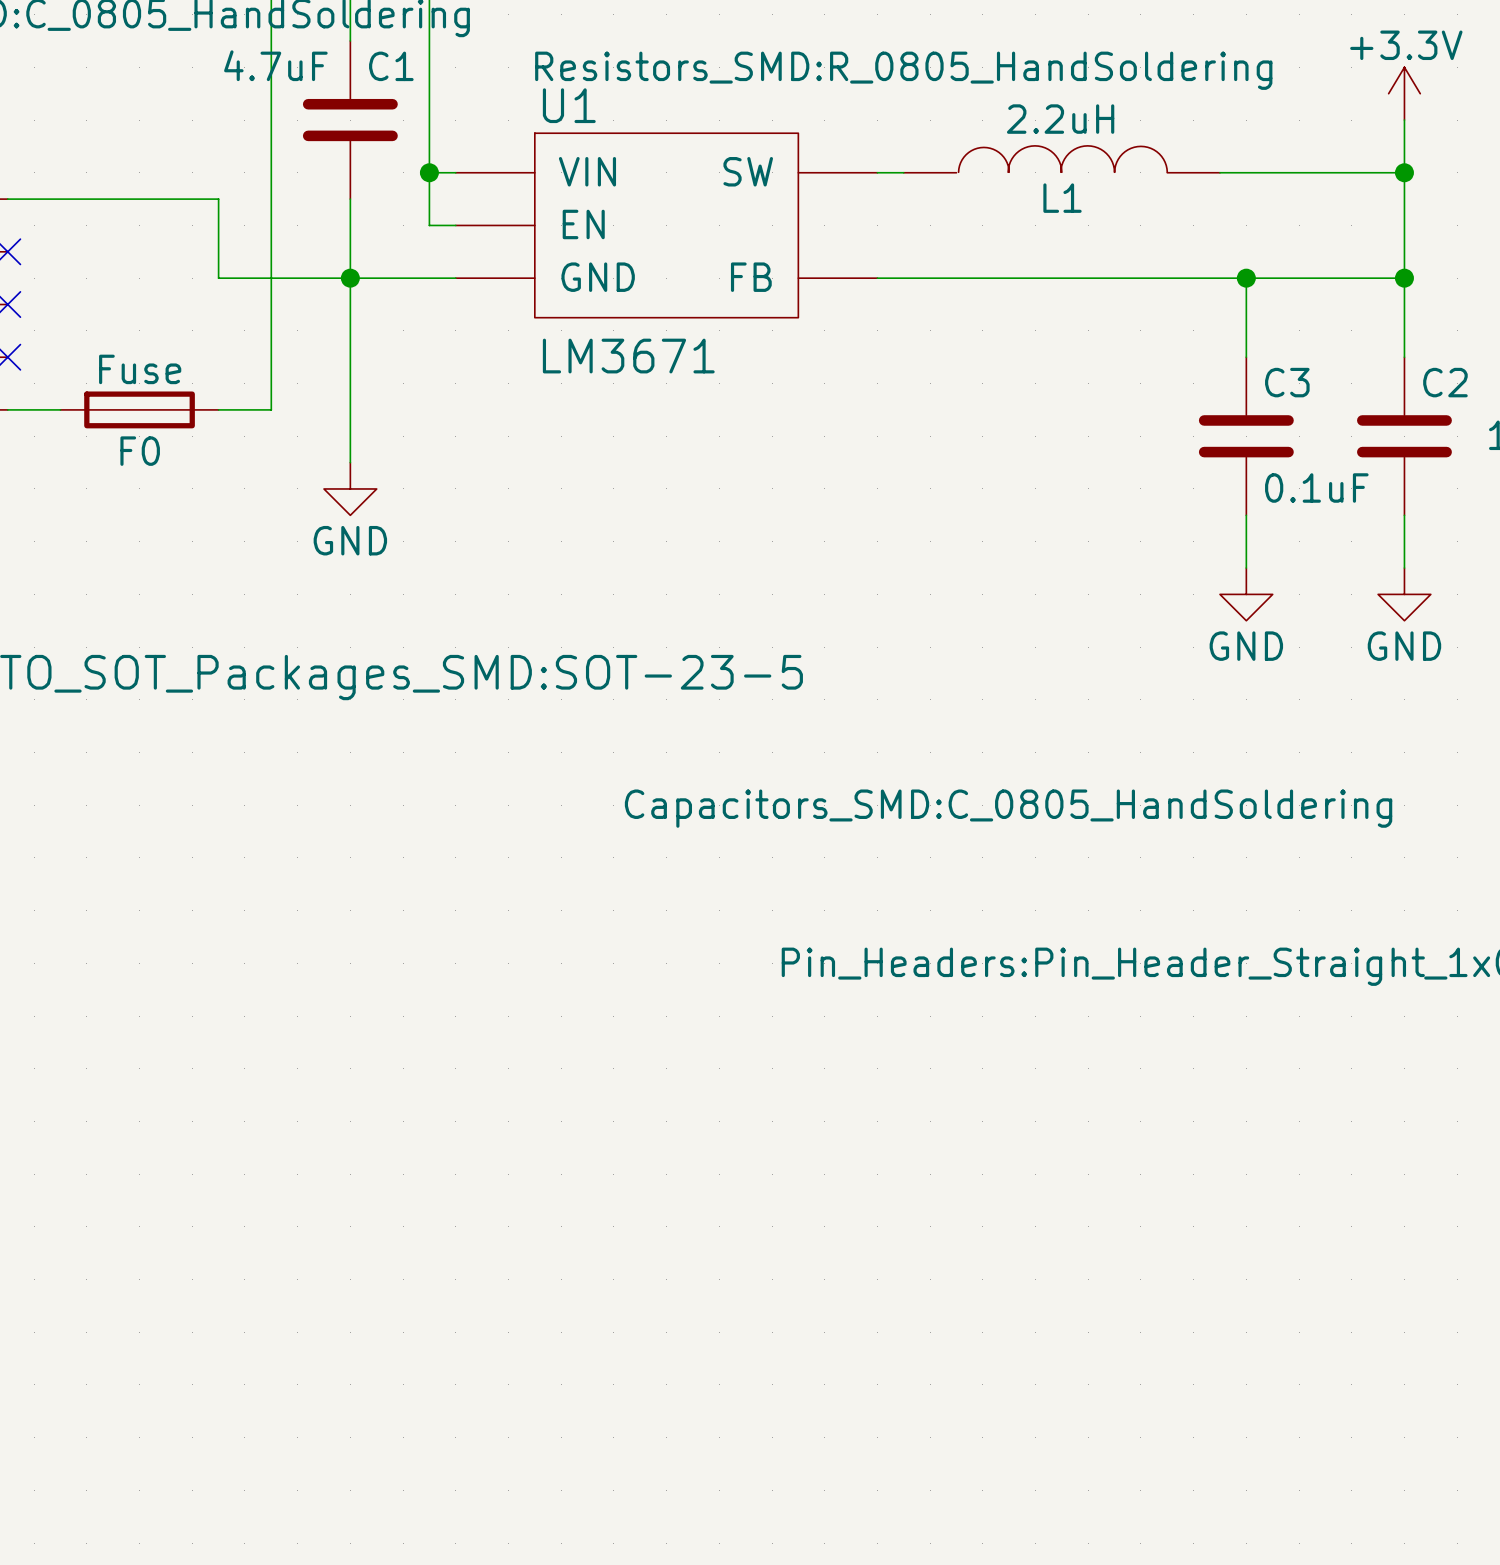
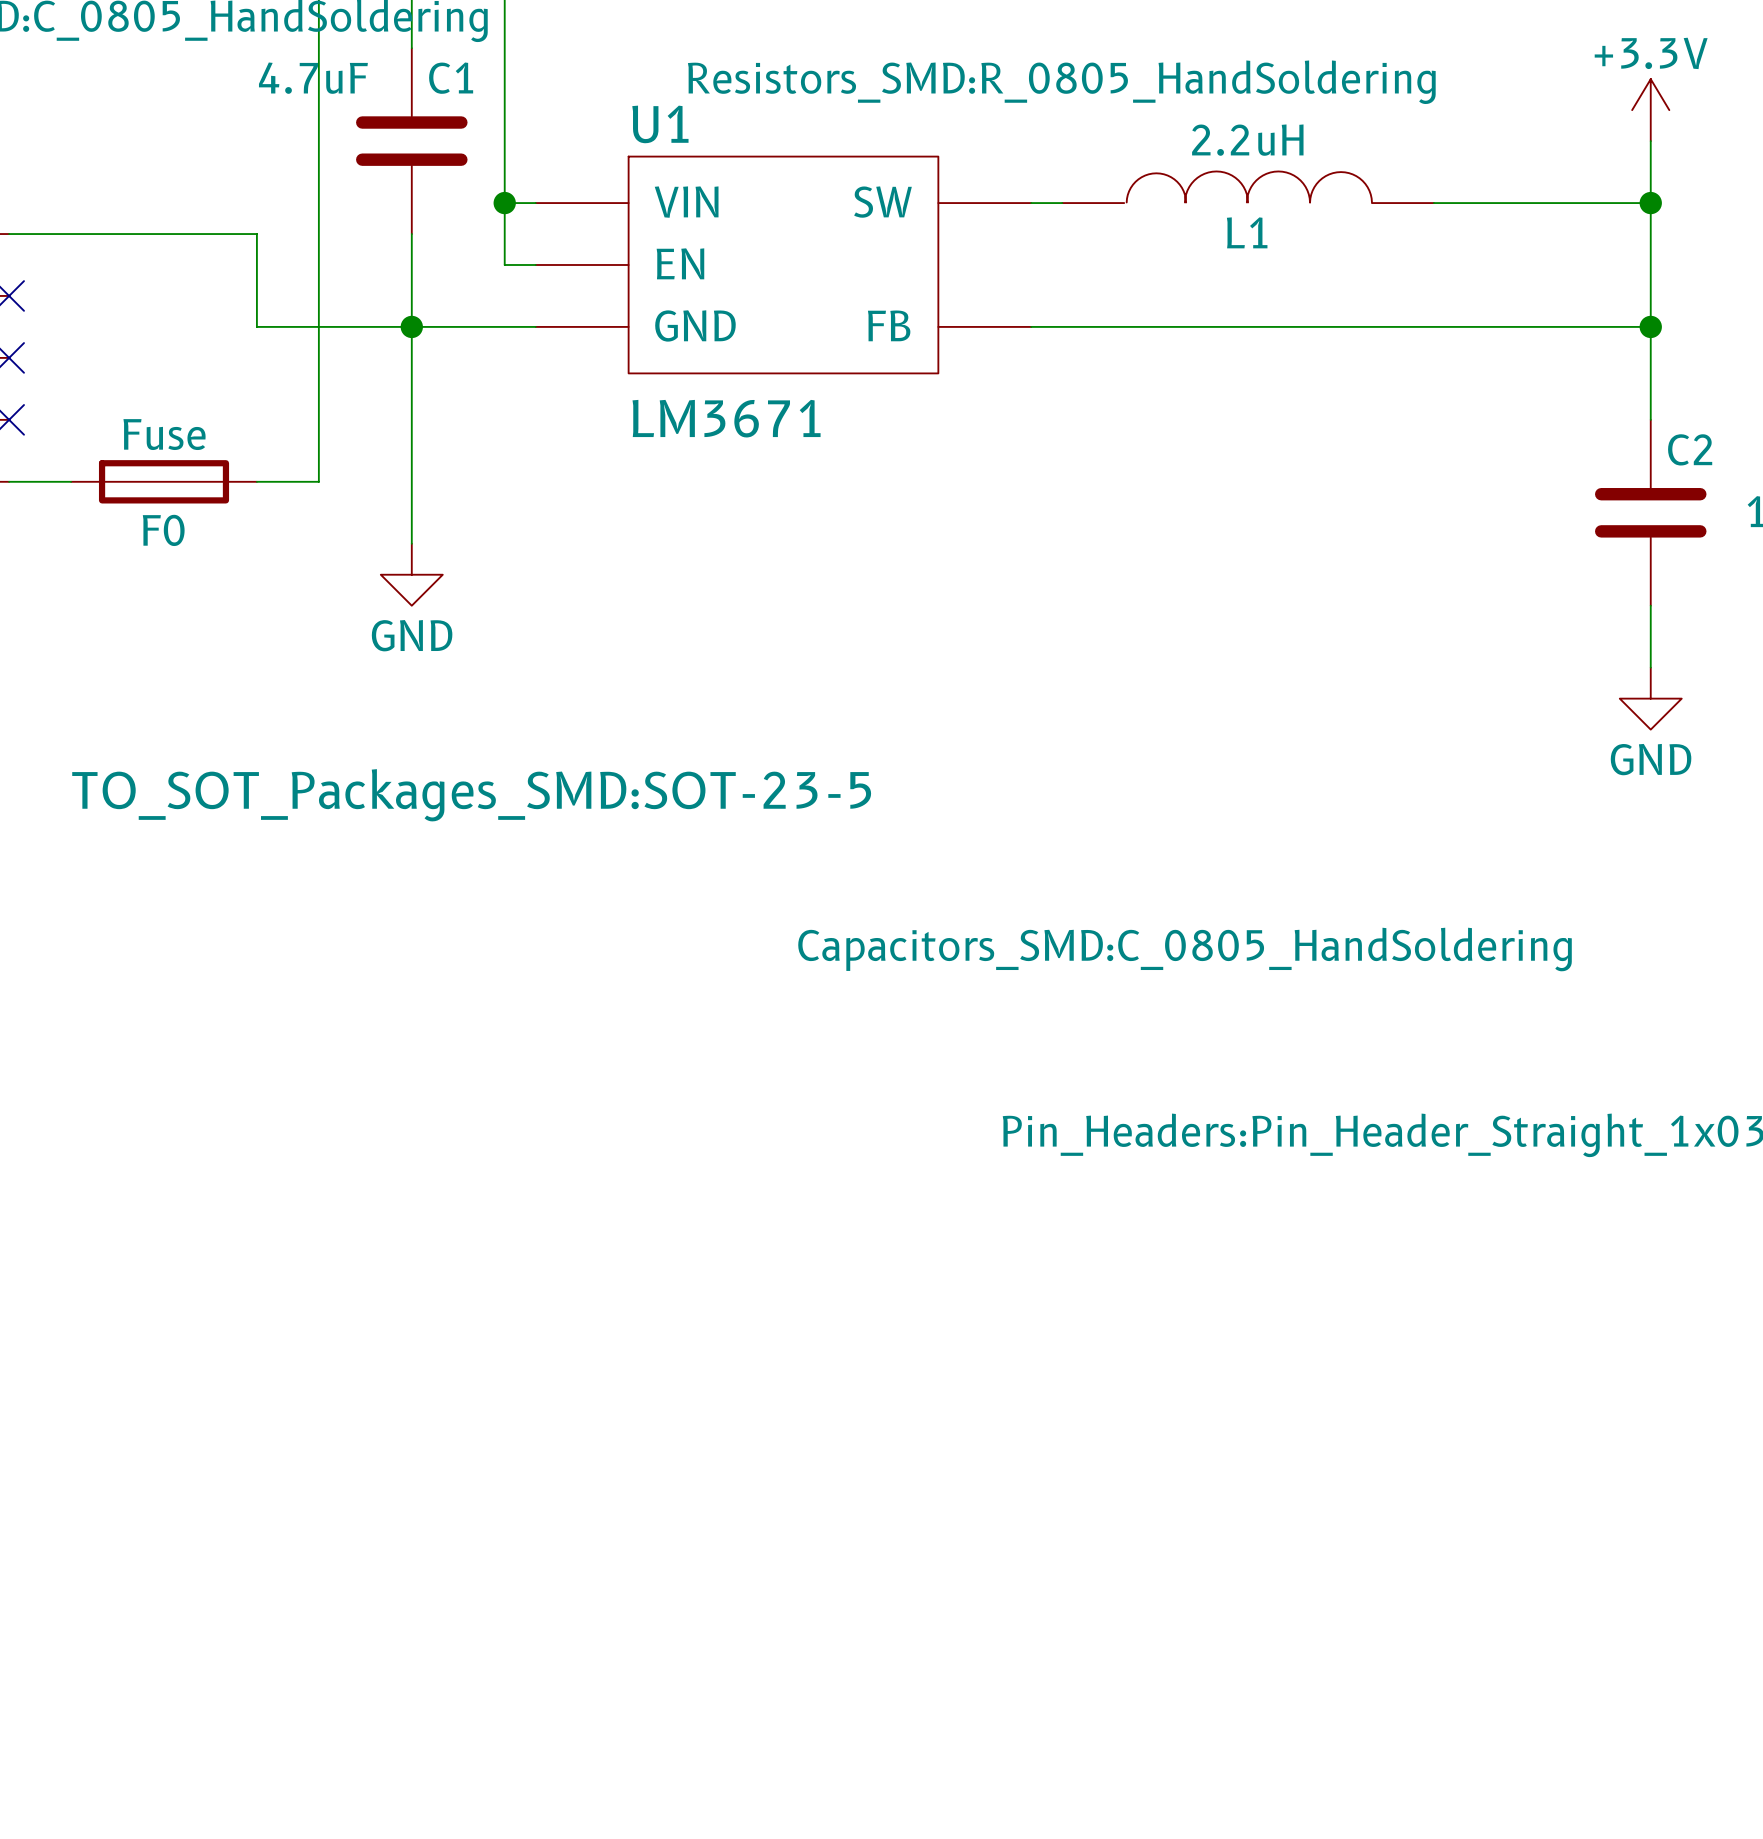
wire: (1246, 278) (1246, 357) -> none
junction: (1246, 278) -> none
C3: 0.1uF (1246, 436) -> none
wire: (1246, 515) (1246, 568) -> none
power symbol: GND (1246, 594) -> none

